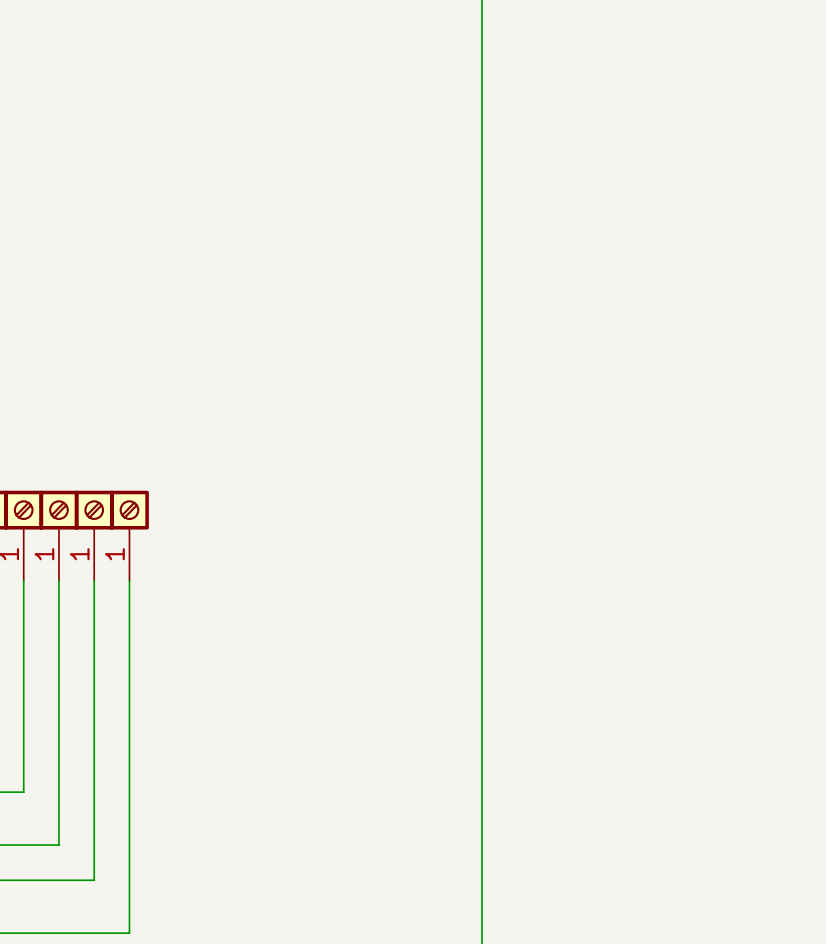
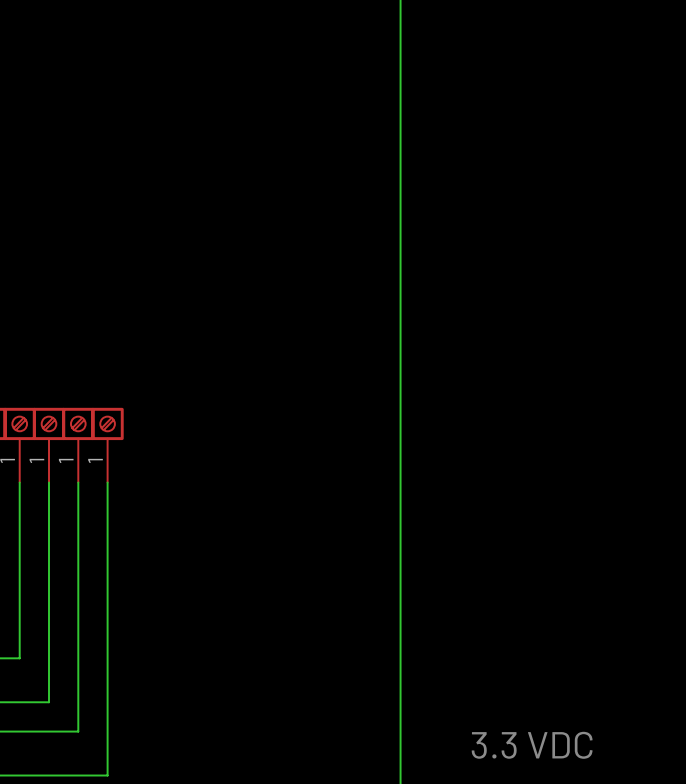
text: none -> 3.3 VDC (532, 745)

